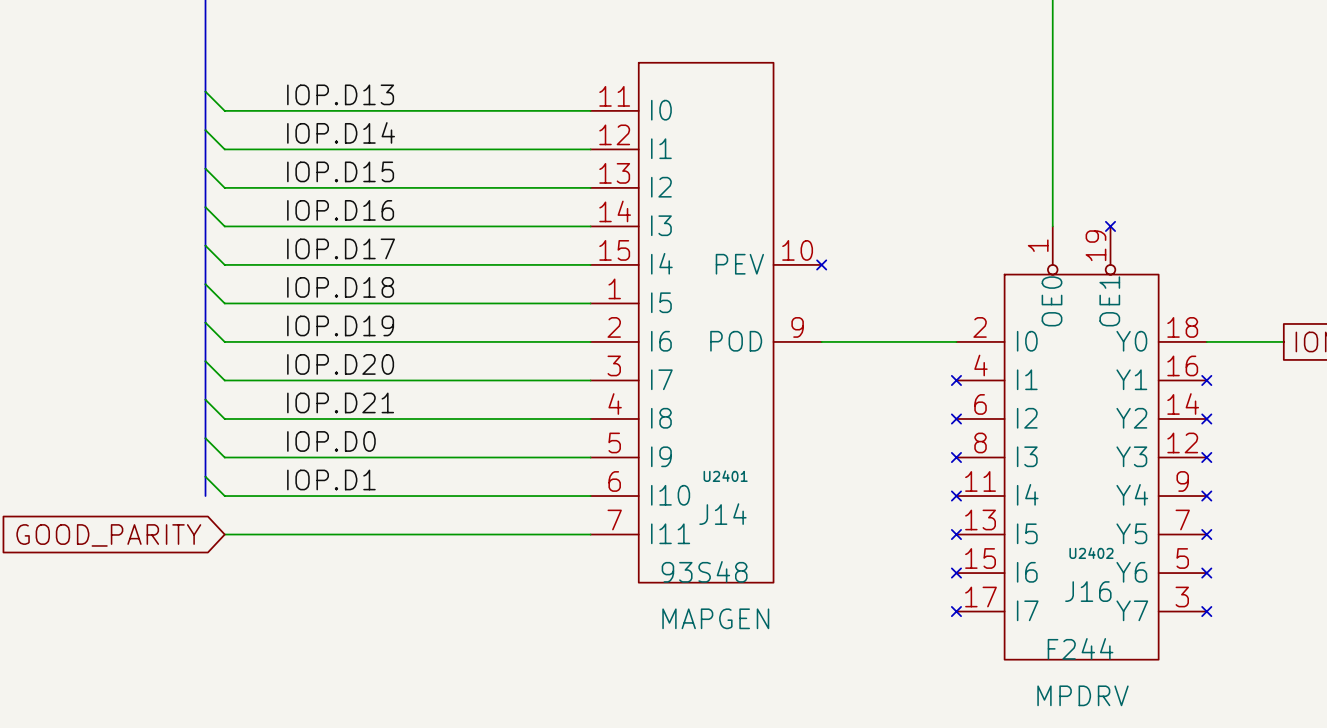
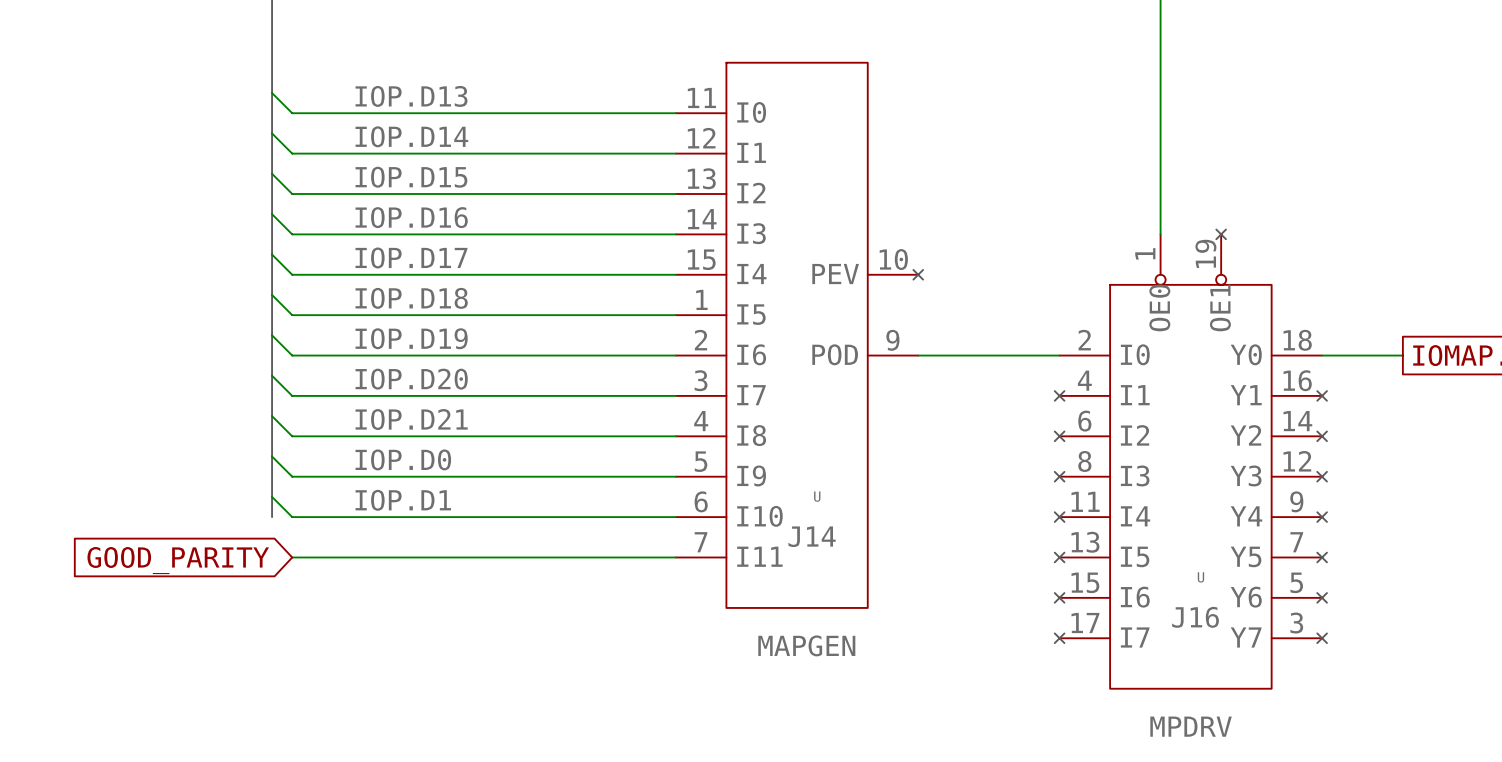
U2401 name: U2401 (725, 476) -> U (817, 496)
U2402 name: U2402 (1091, 553) -> U (1200, 577)
U2401 value: 93S48 (704, 571) -> none
U2402 value: F244 (1080, 648) -> none

